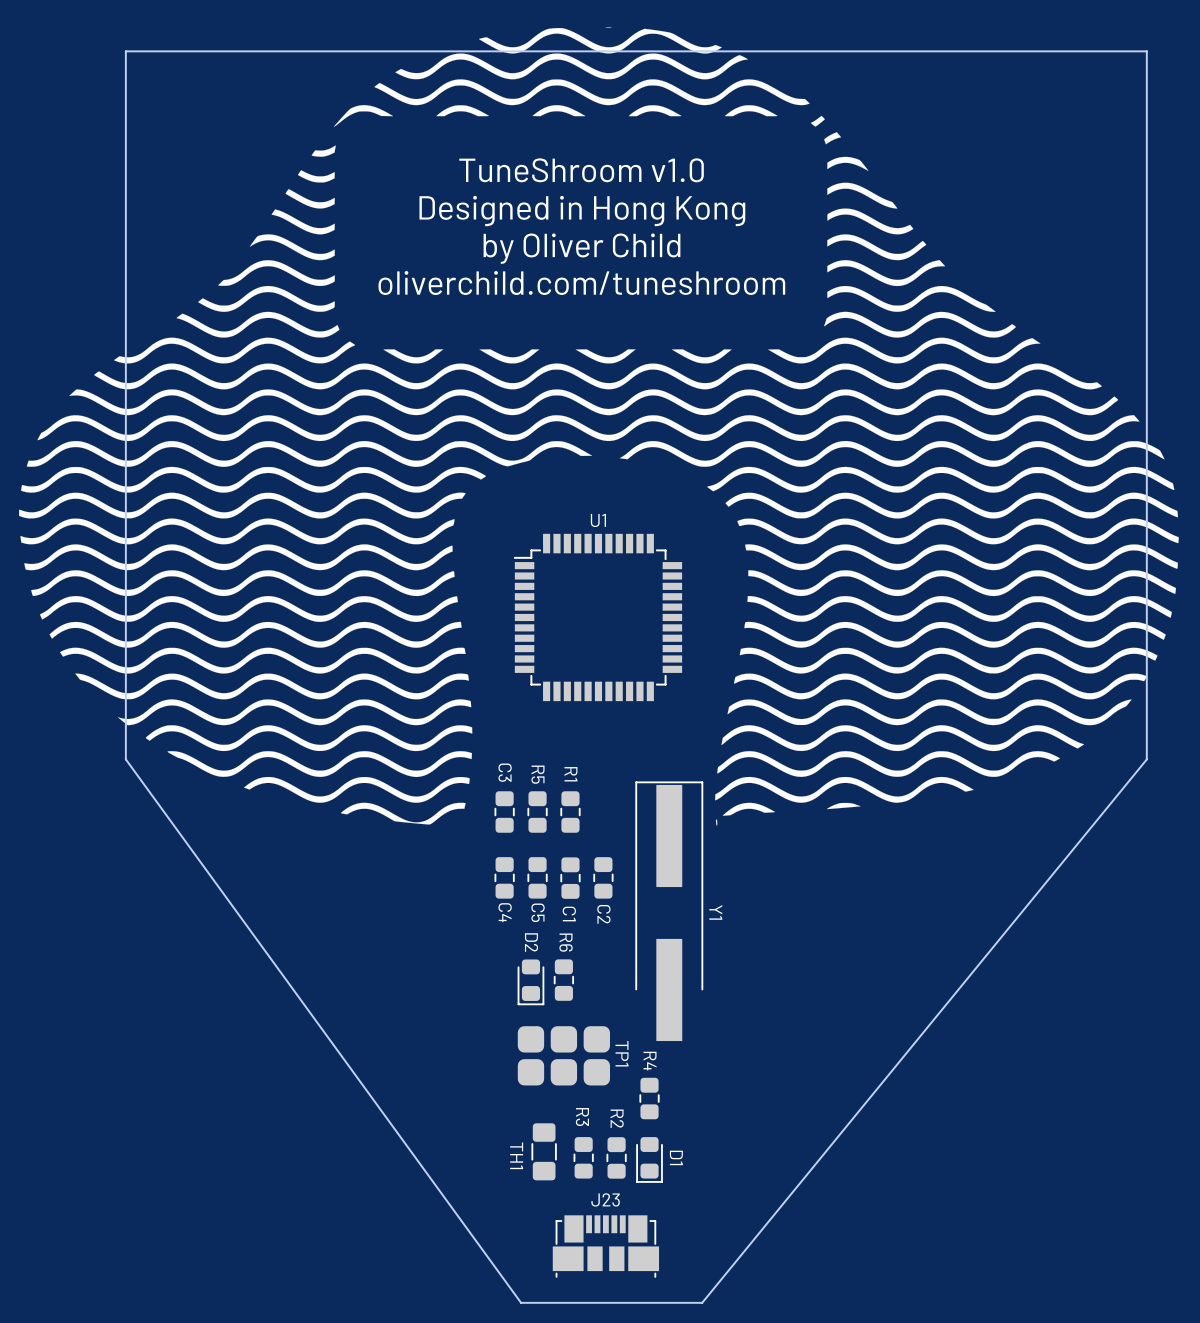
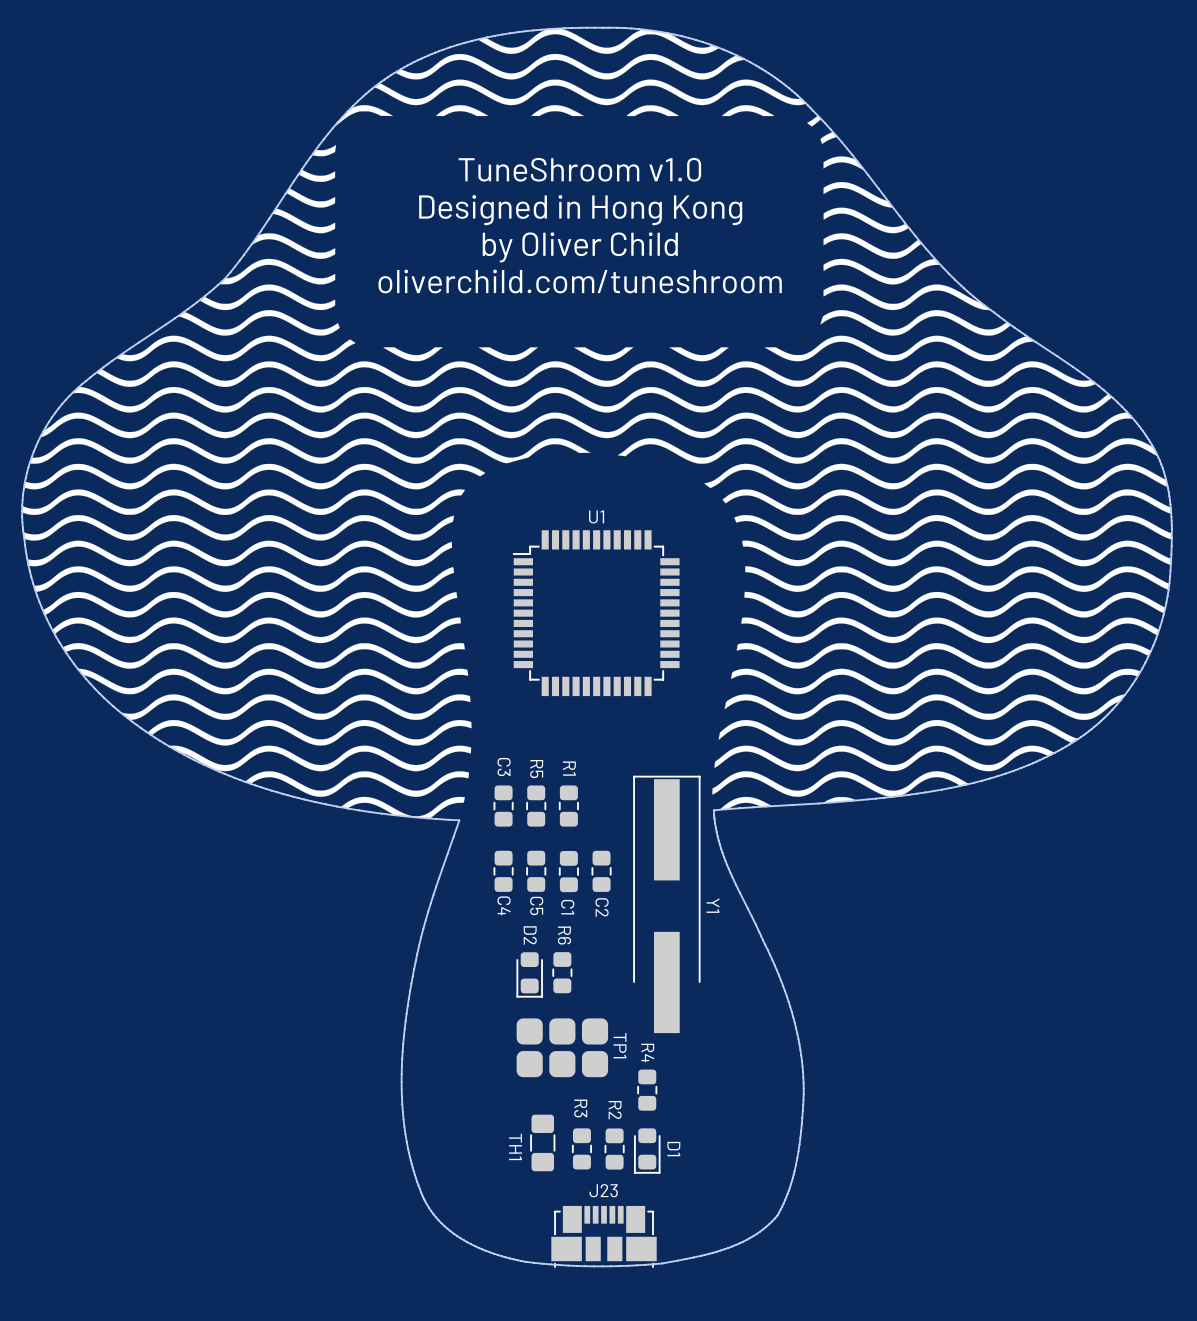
drawing: none -> [21, 27, 1173, 1268]
board edge: (1146, 51) (1146, 759) (702, 1302) (521, 1302) (125, 759) (125, 51) (1146, 51) -> none

